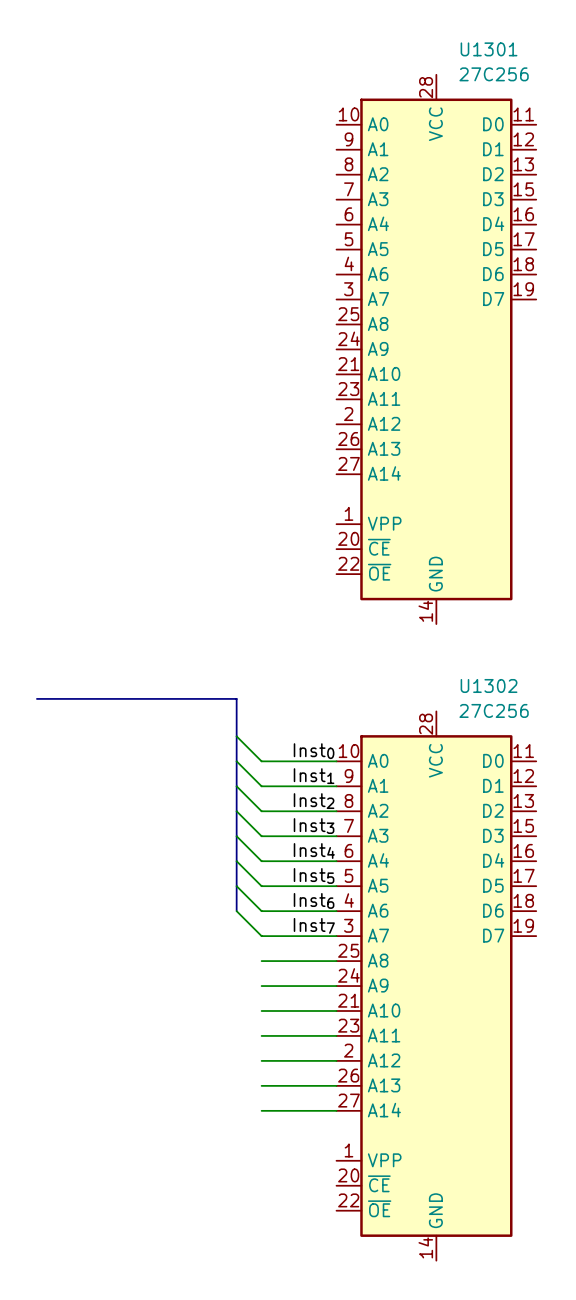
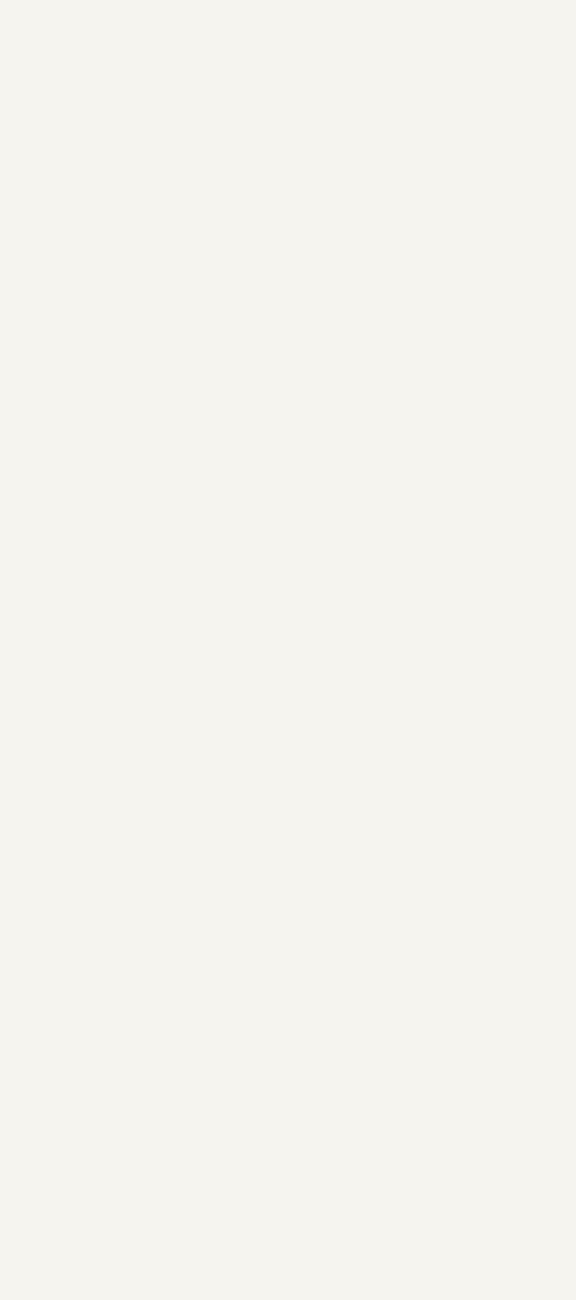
U1301: 27C256 (436, 349) -> none
bus: (36, 698) (236, 698) (236, 911) -> none
wire: (236, 736) (261, 761) (336, 761) -> none
label: Inst0 (314, 751) -> none
wire: (236, 761) (261, 786) (336, 786) -> none
label: Inst1 (314, 776) -> none
wire: (236, 786) (261, 811) (336, 811) -> none
label: Inst2 (314, 801) -> none
wire: (236, 811) (261, 836) (336, 836) -> none
label: Inst3 (314, 826) -> none
wire: (236, 836) (261, 861) (336, 861) -> none
label: Inst4 (314, 851) -> none
wire: (236, 861) (261, 886) (336, 886) -> none
label: Inst5 (314, 875) -> none
wire: (236, 886) (261, 911) (336, 911) -> none
label: Inst6 (314, 900) -> none
wire: (236, 911) (261, 936) (336, 936) -> none
label: Inst7 (314, 925) -> none
wire: (261, 961) (336, 961) -> none
wire: (261, 986) (336, 986) -> none
U1302: 27C256 (436, 986) -> none
wire: (261, 1010) (336, 1010) -> none
wire: (261, 1035) (336, 1035) -> none
wire: (261, 1060) (336, 1060) -> none
wire: (261, 1085) (336, 1085) -> none
wire: (261, 1110) (336, 1110) -> none

